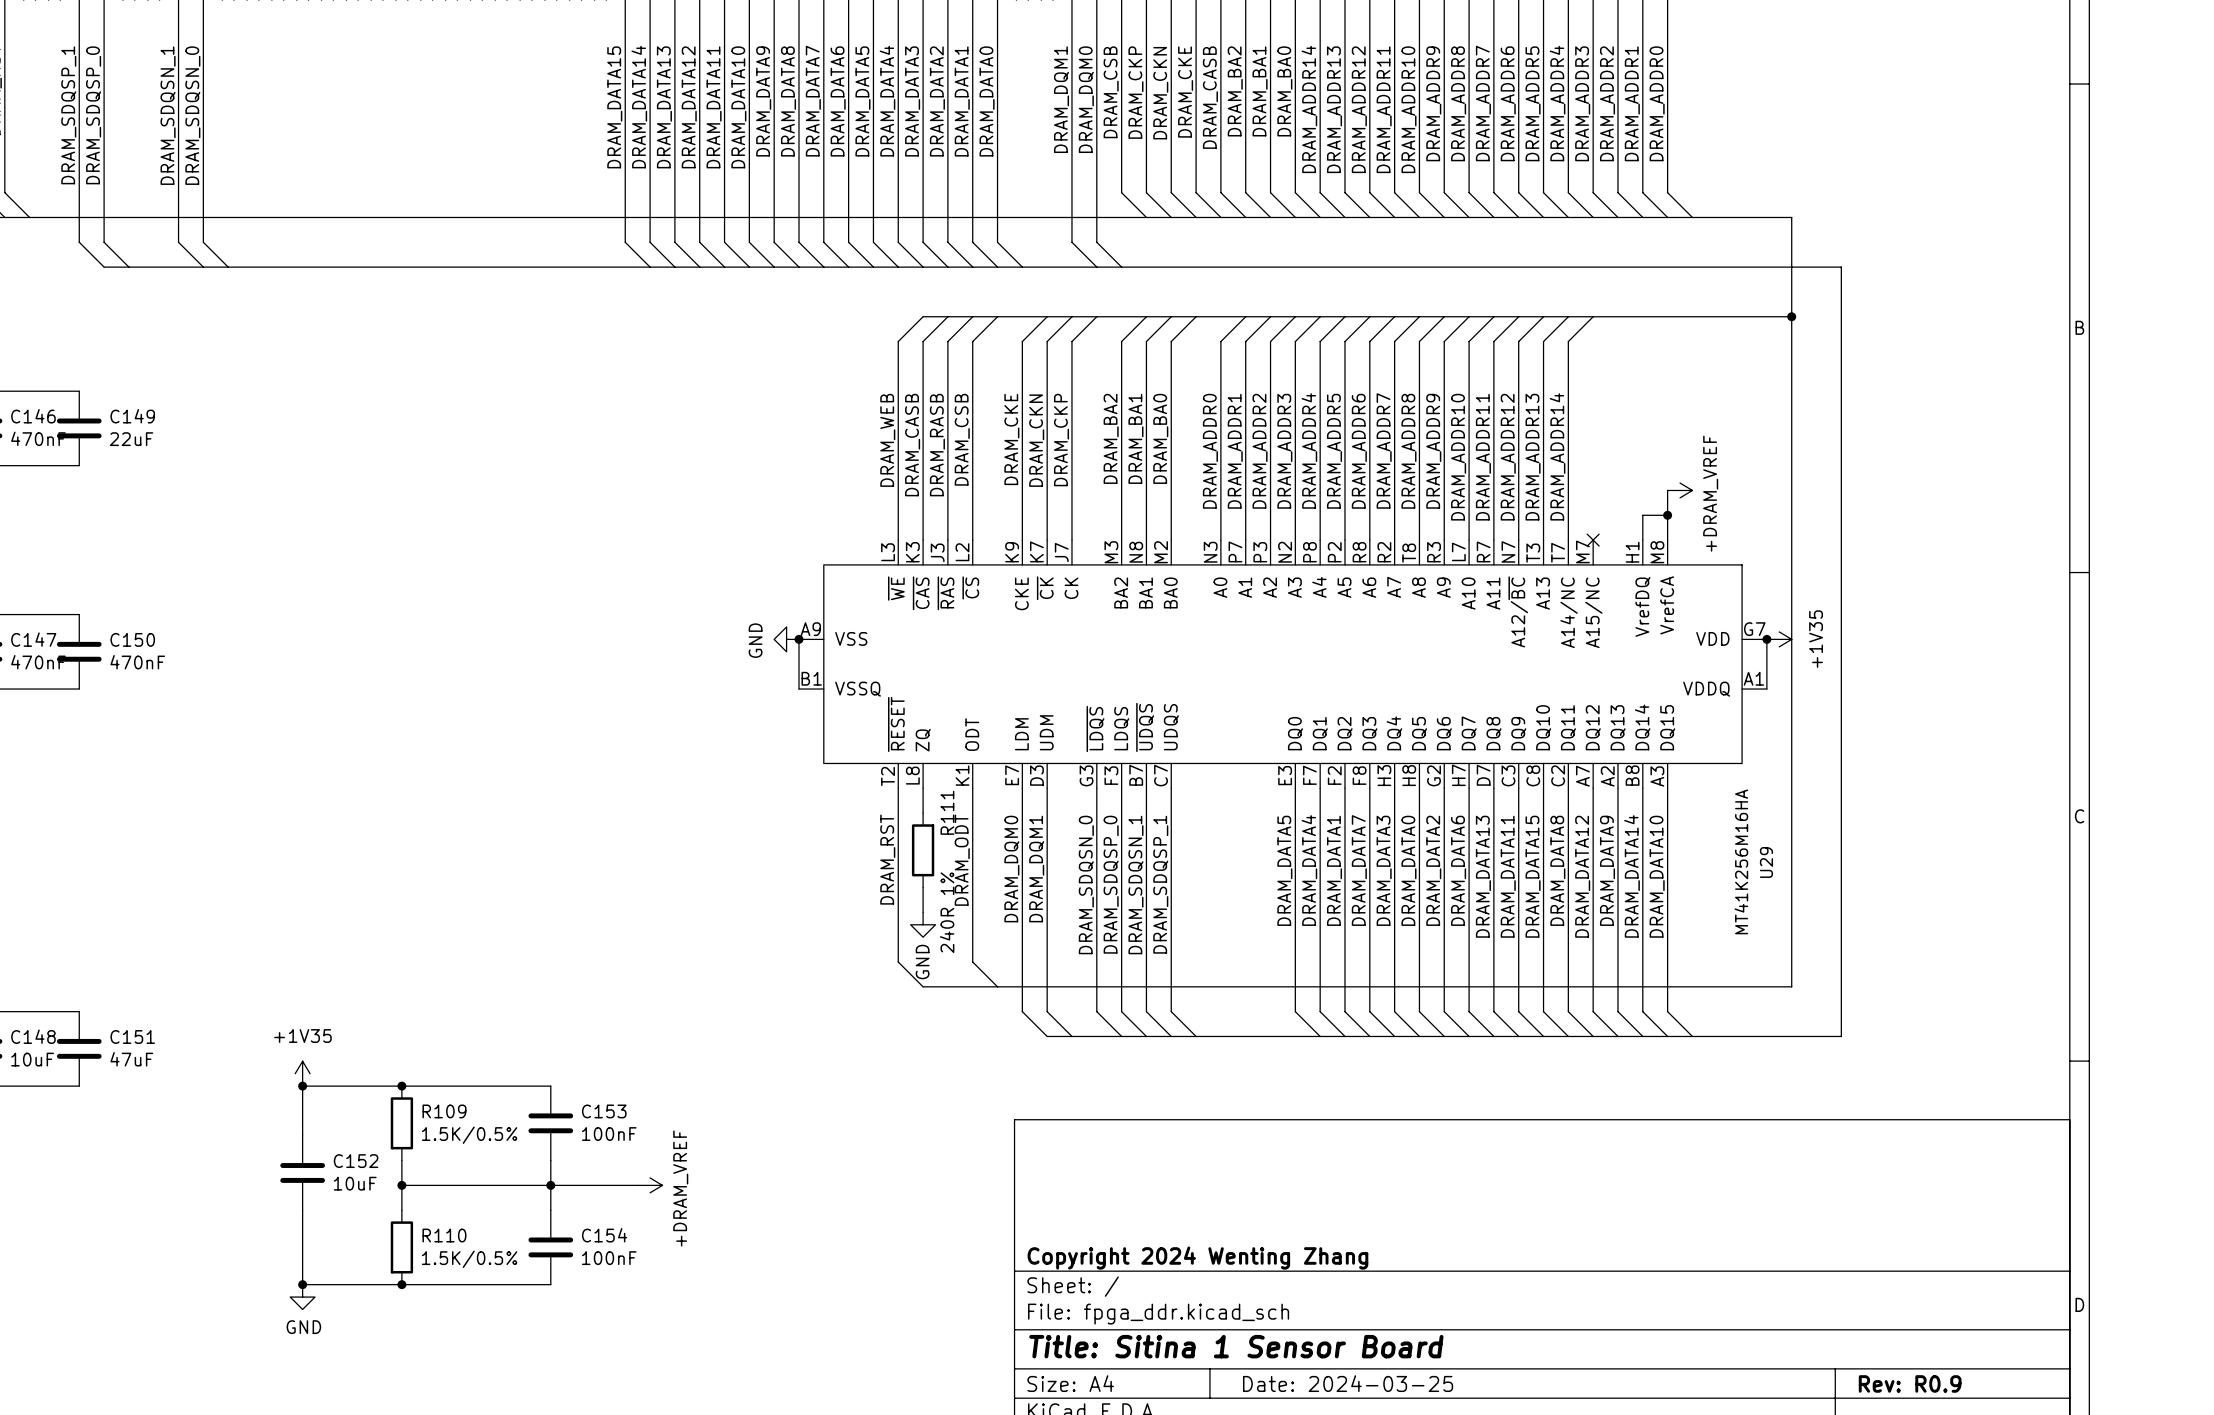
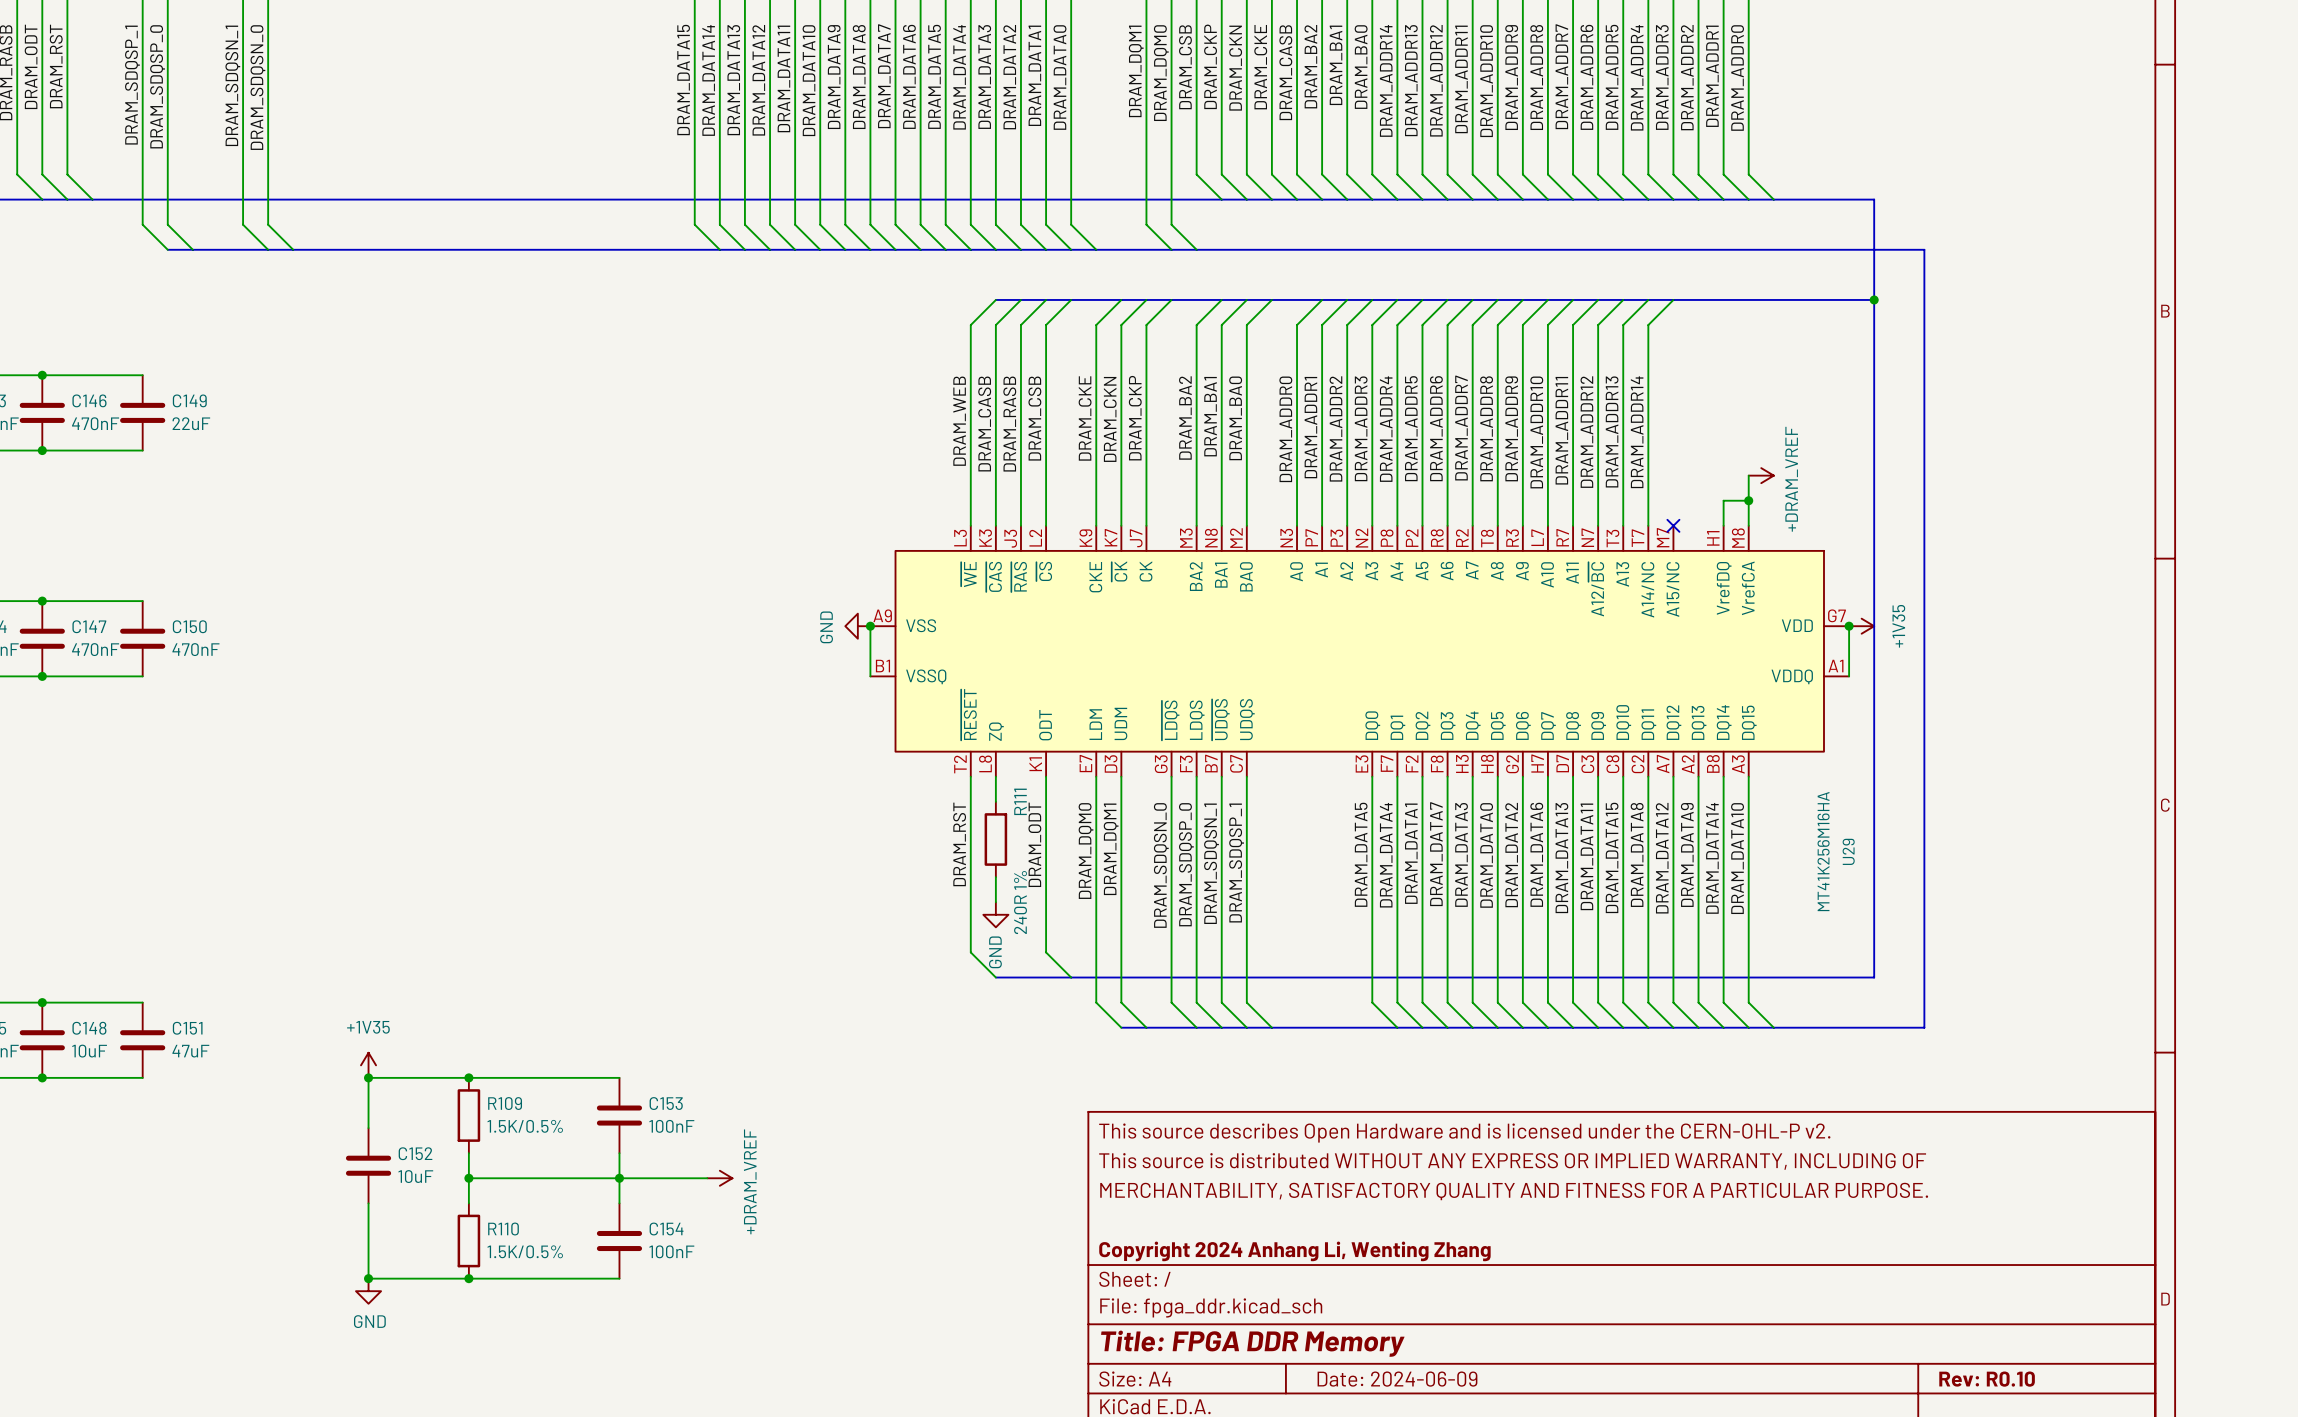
title block: none -> This source describes Open Hardware and is licensed under the CERN-OHL-P v2. (1464, 1133)
title block: none -> This source is distributed WITHOUT ANY EXPRESS OR IMPLIED WARRANTY, INCLUDING OF (1512, 1161)
title block: none -> MERCHANTABILITY, SATISFACTORY QUALITY AND FITNESS FOR A PARTICULAR PURPOSE. (1514, 1191)
title block: Copyright 2024 Wenting Zhang (1197, 1258) -> Copyright 2024 Anhang Li, Wenting Zhang (1294, 1251)
title block: Title: Sitina 1 Sensor Board (1236, 1346) -> Title: FPGA DDR Memory (1252, 1343)
title block: Date: 2024-03-25 (1348, 1383) -> Date: 2024-06-09 (1397, 1379)
title block: Rev: R0.9 (1910, 1383) -> Rev: R0.10 (1987, 1379)

